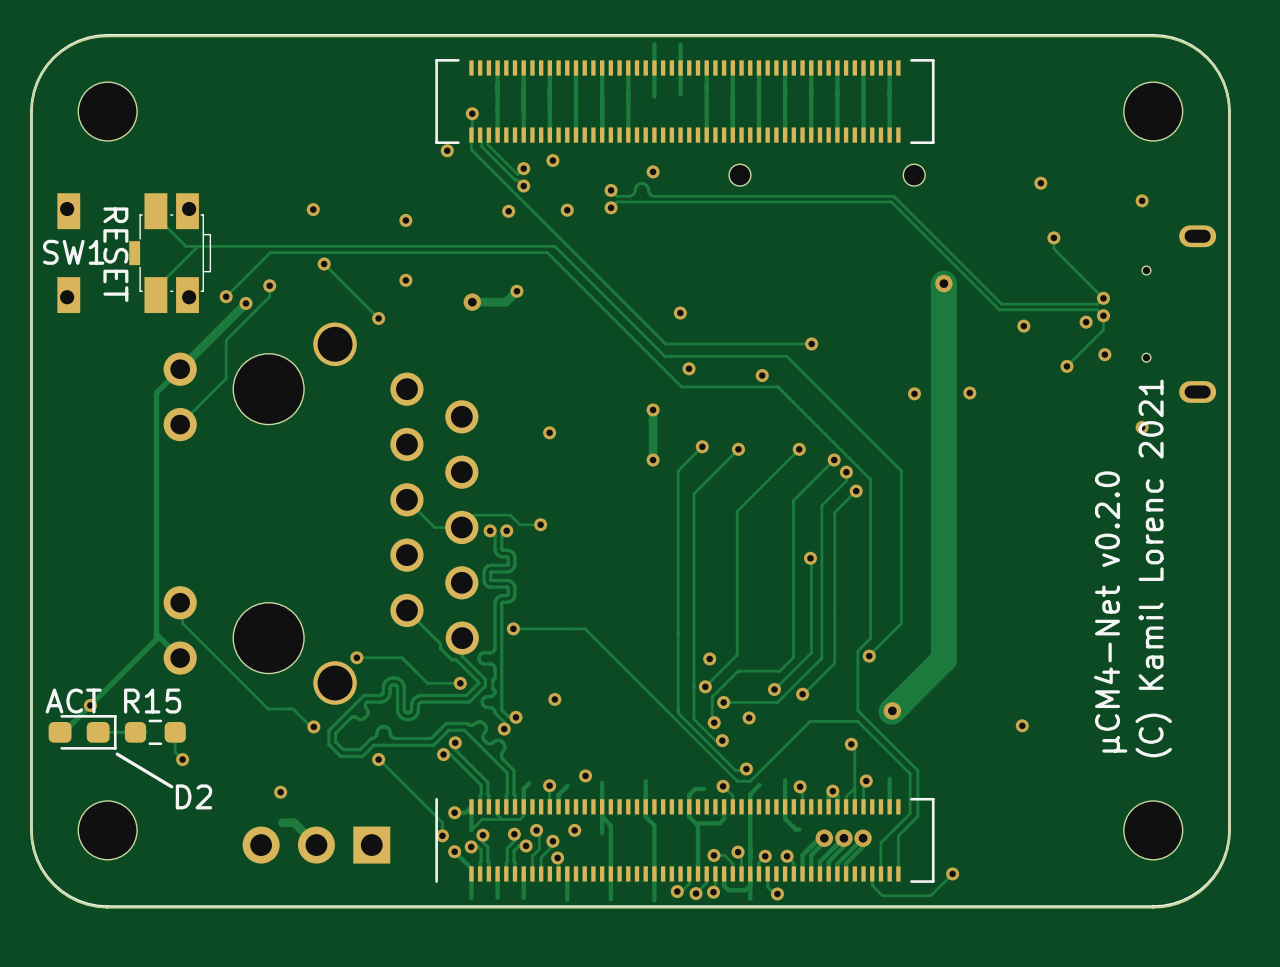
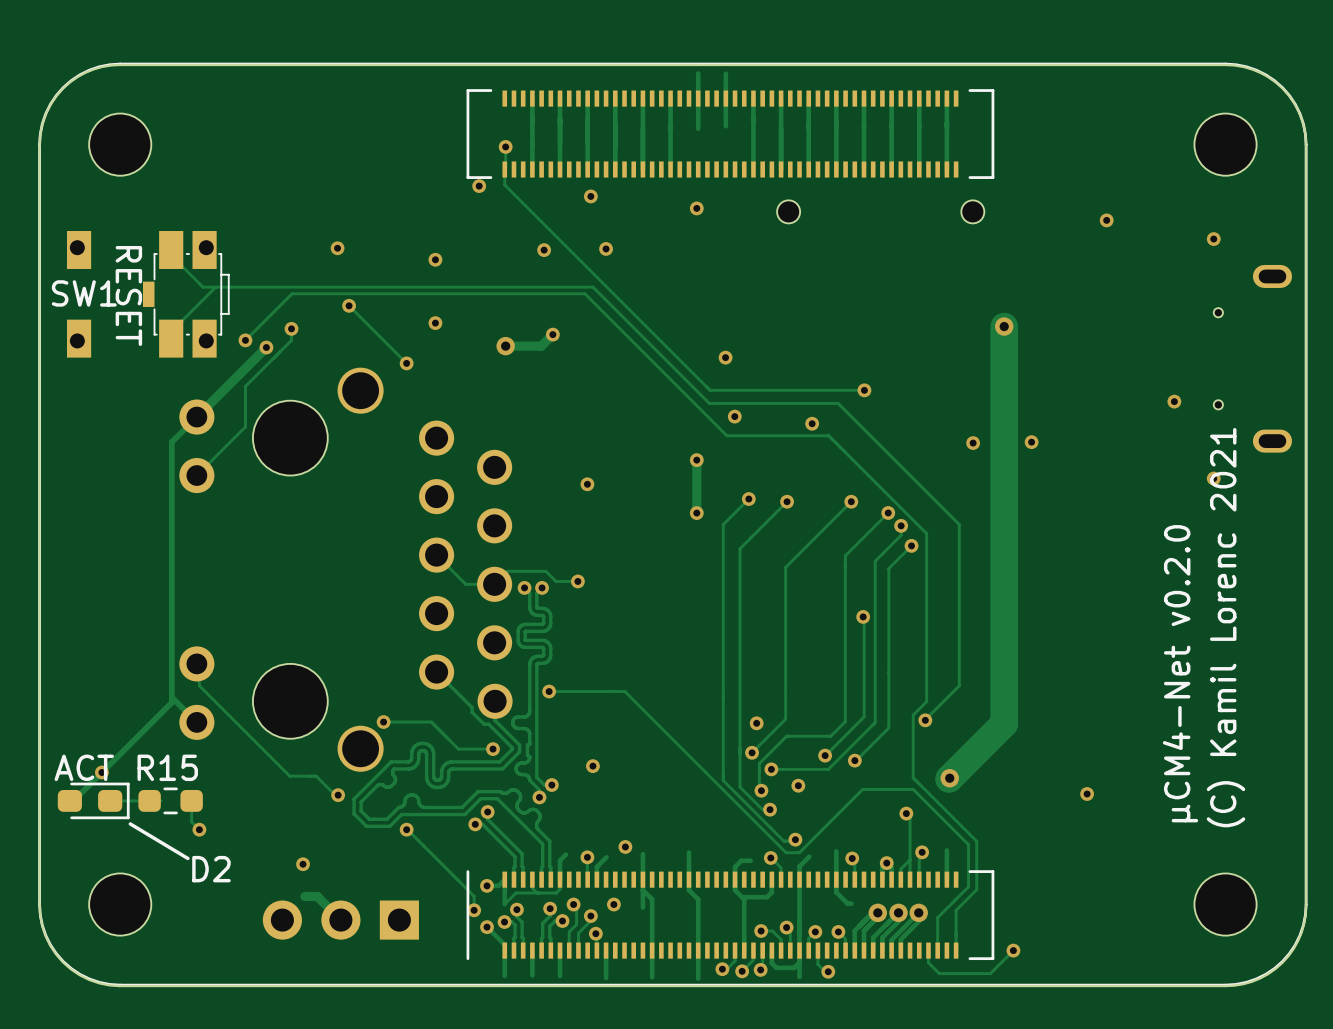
track: (480, 135) (481, 146) (523, 186) -> none
track: (488, 135) (487, 144) (517, 174) -> none
via: (523, 168) -> none
track: (641, 183) (636, 185) (634, 192) (630, 196) (616, 196) (611, 190) -> none
track: (642, 183) (647, 185) (649, 193) (654, 196) (893, 196) (1001, 304) (1097, 304) (1103, 298) (1053, 248) (1053, 237) -> none
via: (523, 186) -> none
via: (611, 190) -> none
track: (611, 207) (616, 201) (891, 201) (999, 309) (1097, 309) (1103, 315) (1103, 329) (1066, 366) -> none
via: (611, 207) -> none
via: (1053, 237) -> none
via: (1103, 298) -> none
via: (1103, 315) -> none
via: (1086, 322) -> none
via: (1023, 326) -> none
via: (1066, 366) -> none

